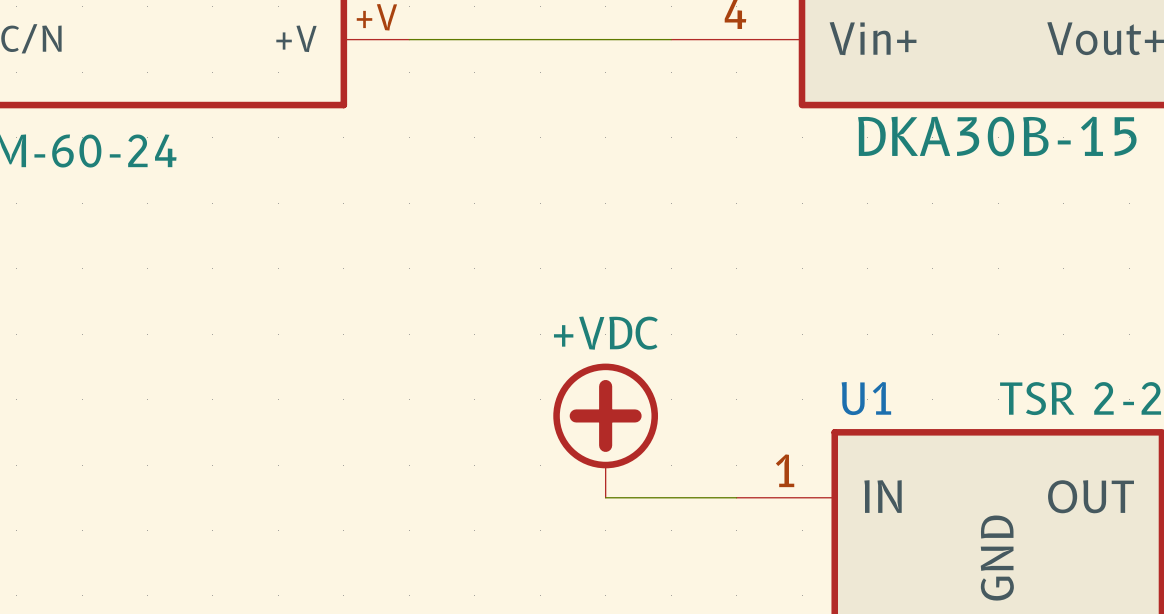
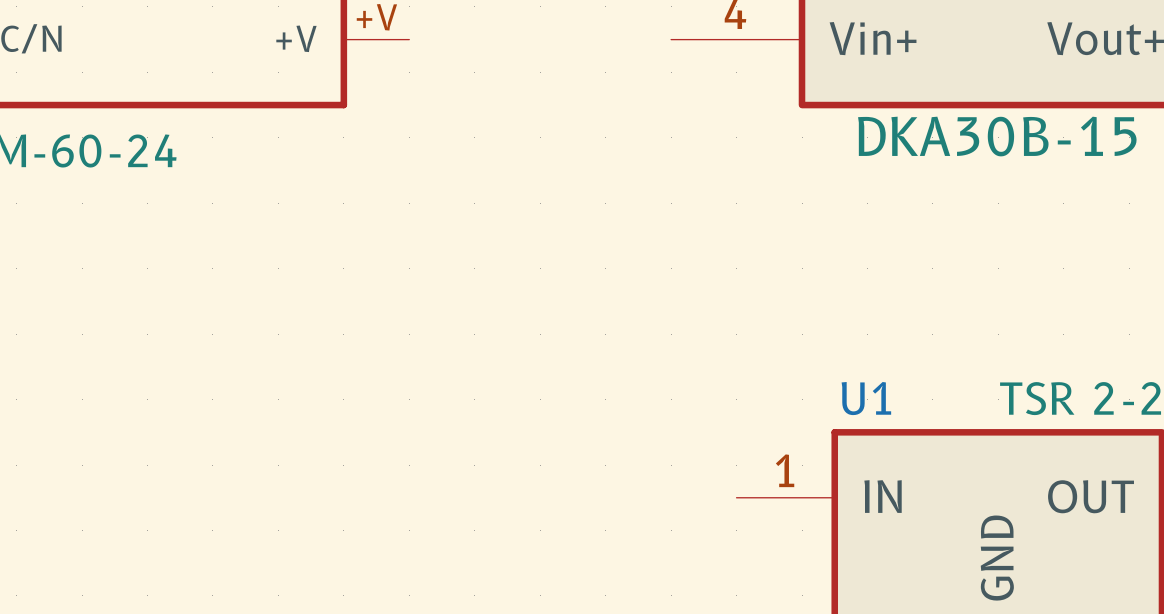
wire: (409, 39) (671, 39) -> none
power symbol: +VDC (605, 430) -> none
wire: (605, 497) (736, 497) -> none

